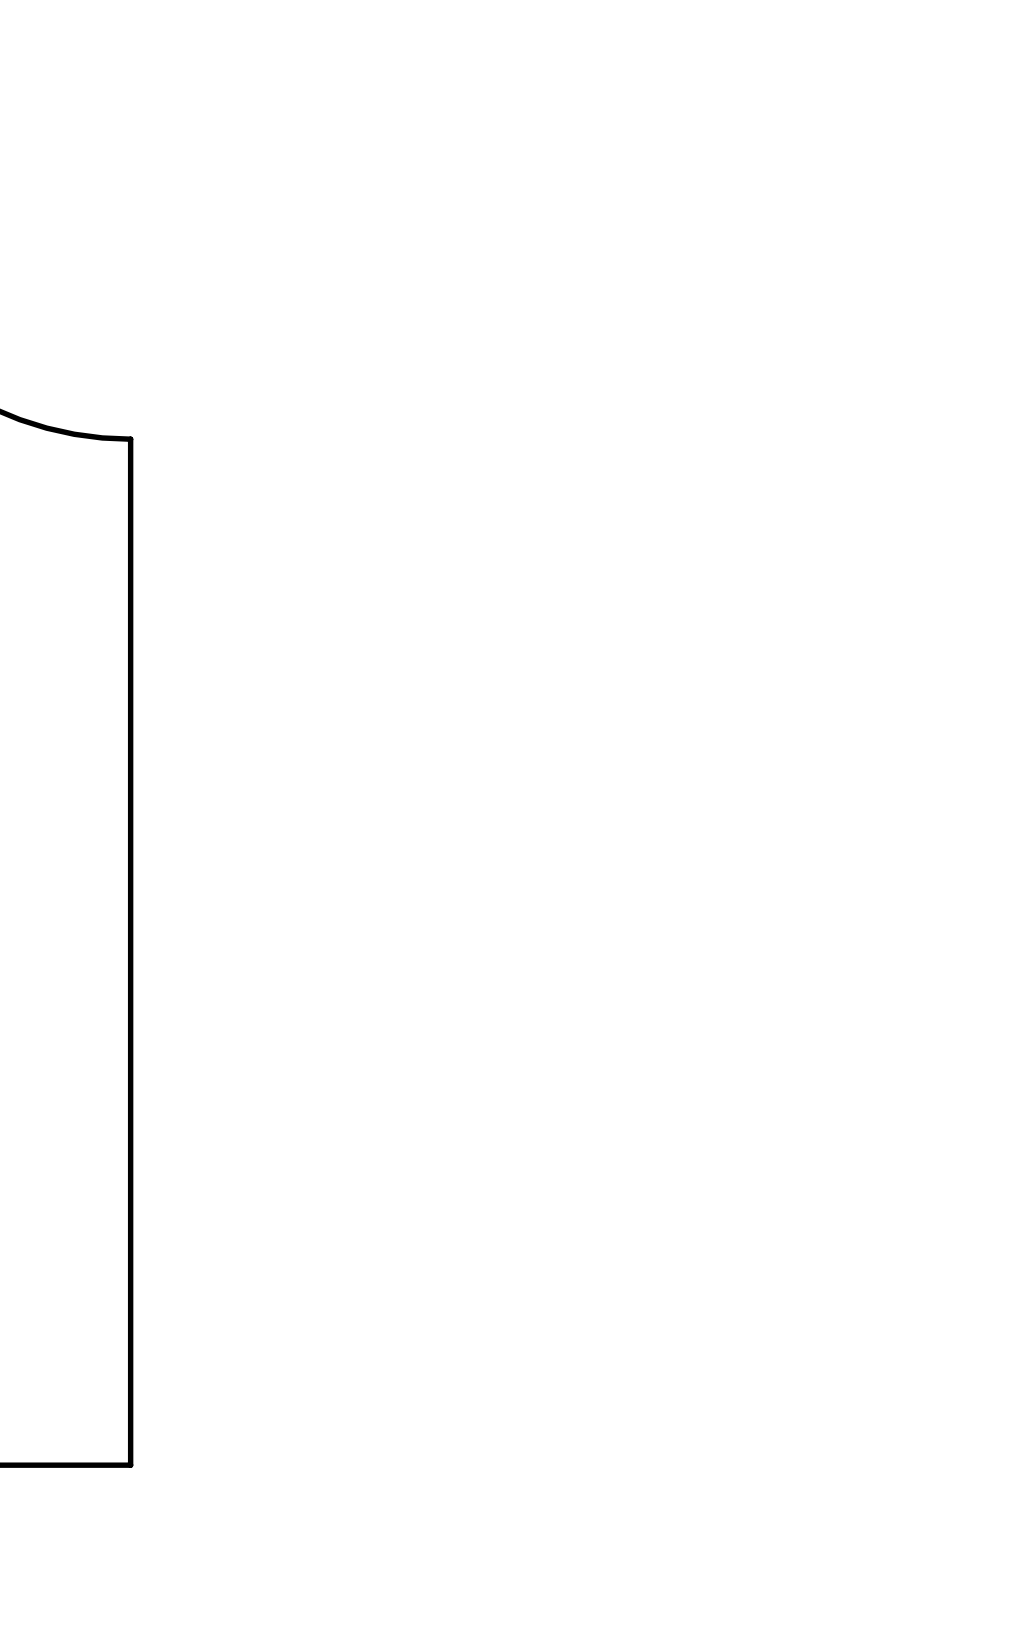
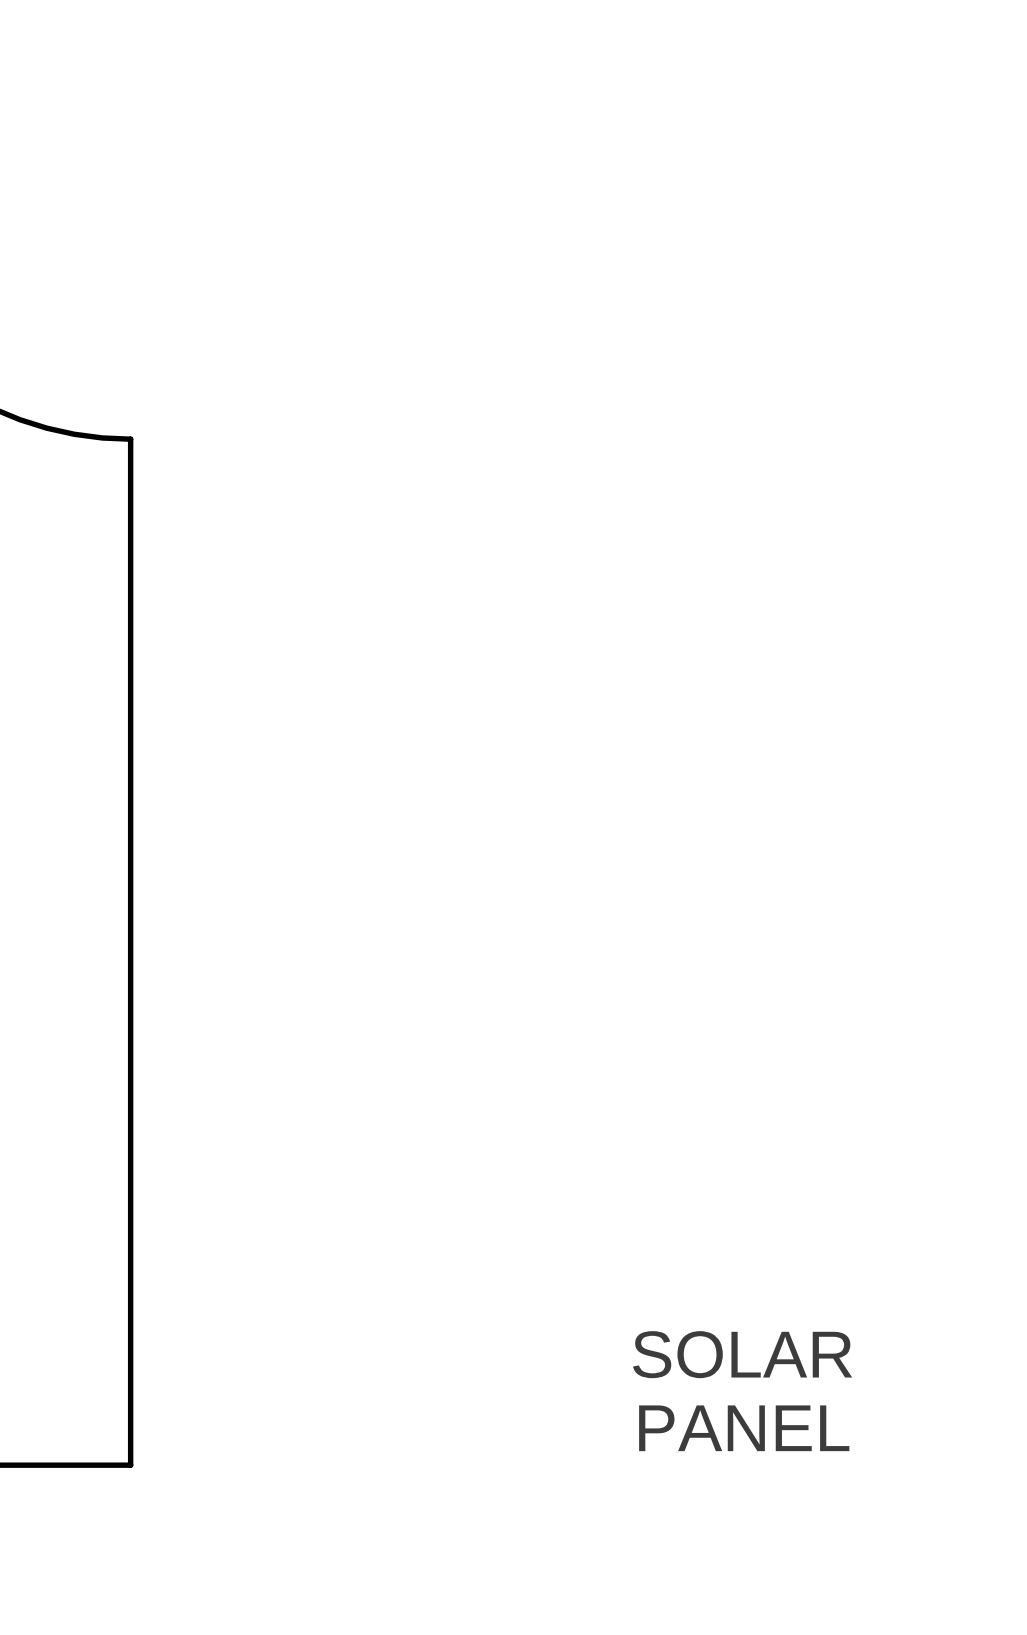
text: none -> SOLAR (742, 1354)
text: none -> PANEL (744, 1428)

